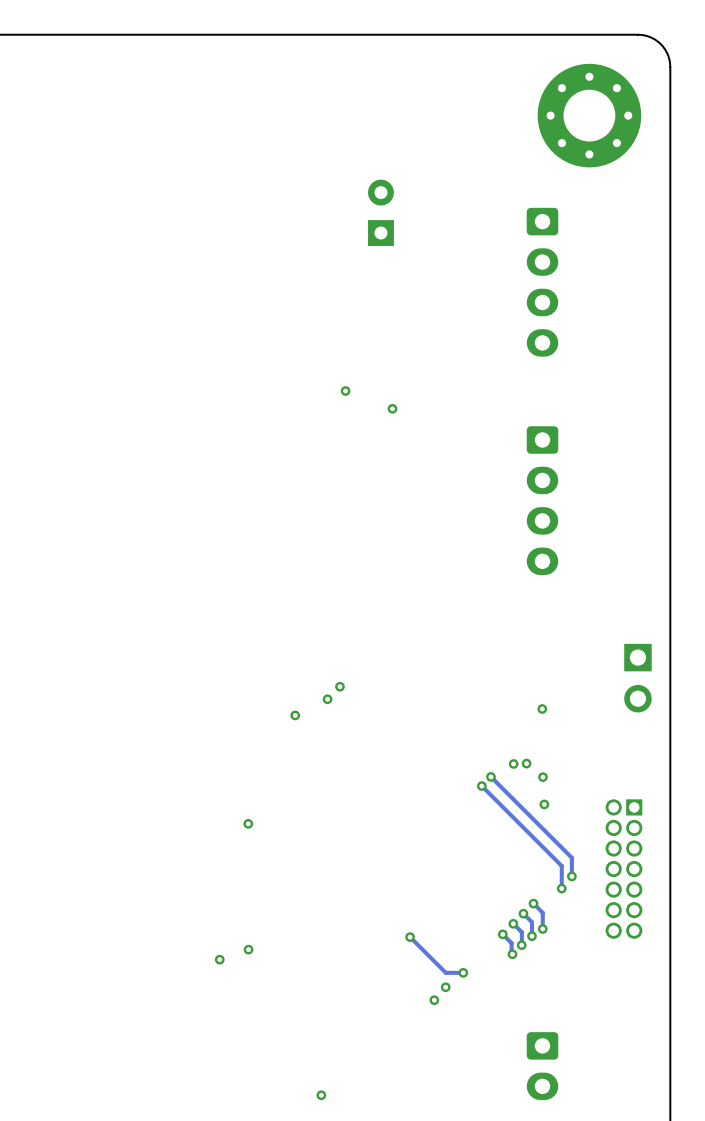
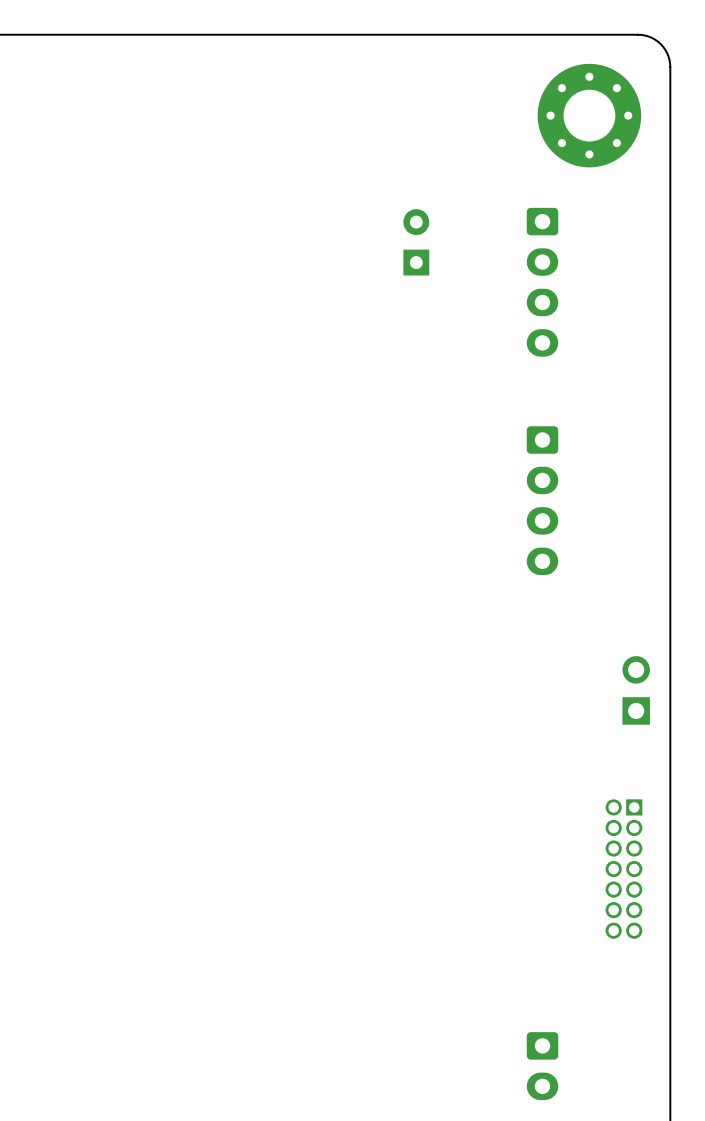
part position: (380, 212) -> (416, 242)
via: (345, 391) -> none
via: (392, 408) -> none
part rotation: 0° (637, 678) -> 180° (636, 690)
via: (339, 686) -> none
via: (327, 699) -> none
via: (542, 708) -> none
via: (295, 715) -> none
via: (513, 763) -> none
via: (526, 763) -> none
track: (490, 776) (571, 857) (571, 876) -> none
via: (490, 776) -> none
via: (542, 777) -> none
track: (481, 786) (561, 866) (561, 888) -> none
via: (481, 786) -> none
via: (544, 804) -> none
via: (248, 823) -> none
via: (571, 876) -> none
via: (561, 888) -> none
track: (533, 903) (542, 912) (542, 929) -> none
via: (533, 903) -> none
track: (523, 913) (531, 922) (531, 936) -> none
via: (523, 913) -> none
track: (513, 923) (521, 932) (521, 945) -> none
via: (513, 923) -> none
via: (542, 929) -> none
track: (502, 934) (511, 943) (512, 954) -> none
via: (502, 934) -> none
via: (531, 936) -> none
track: (410, 937) (445, 972) (463, 972) -> none
via: (410, 937) -> none
via: (521, 945) -> none
via: (248, 949) -> none
via: (512, 954) -> none
via: (219, 959) -> none
via: (463, 972) -> none
via: (445, 987) -> none
via: (434, 1000) -> none
via: (321, 1095) -> none

